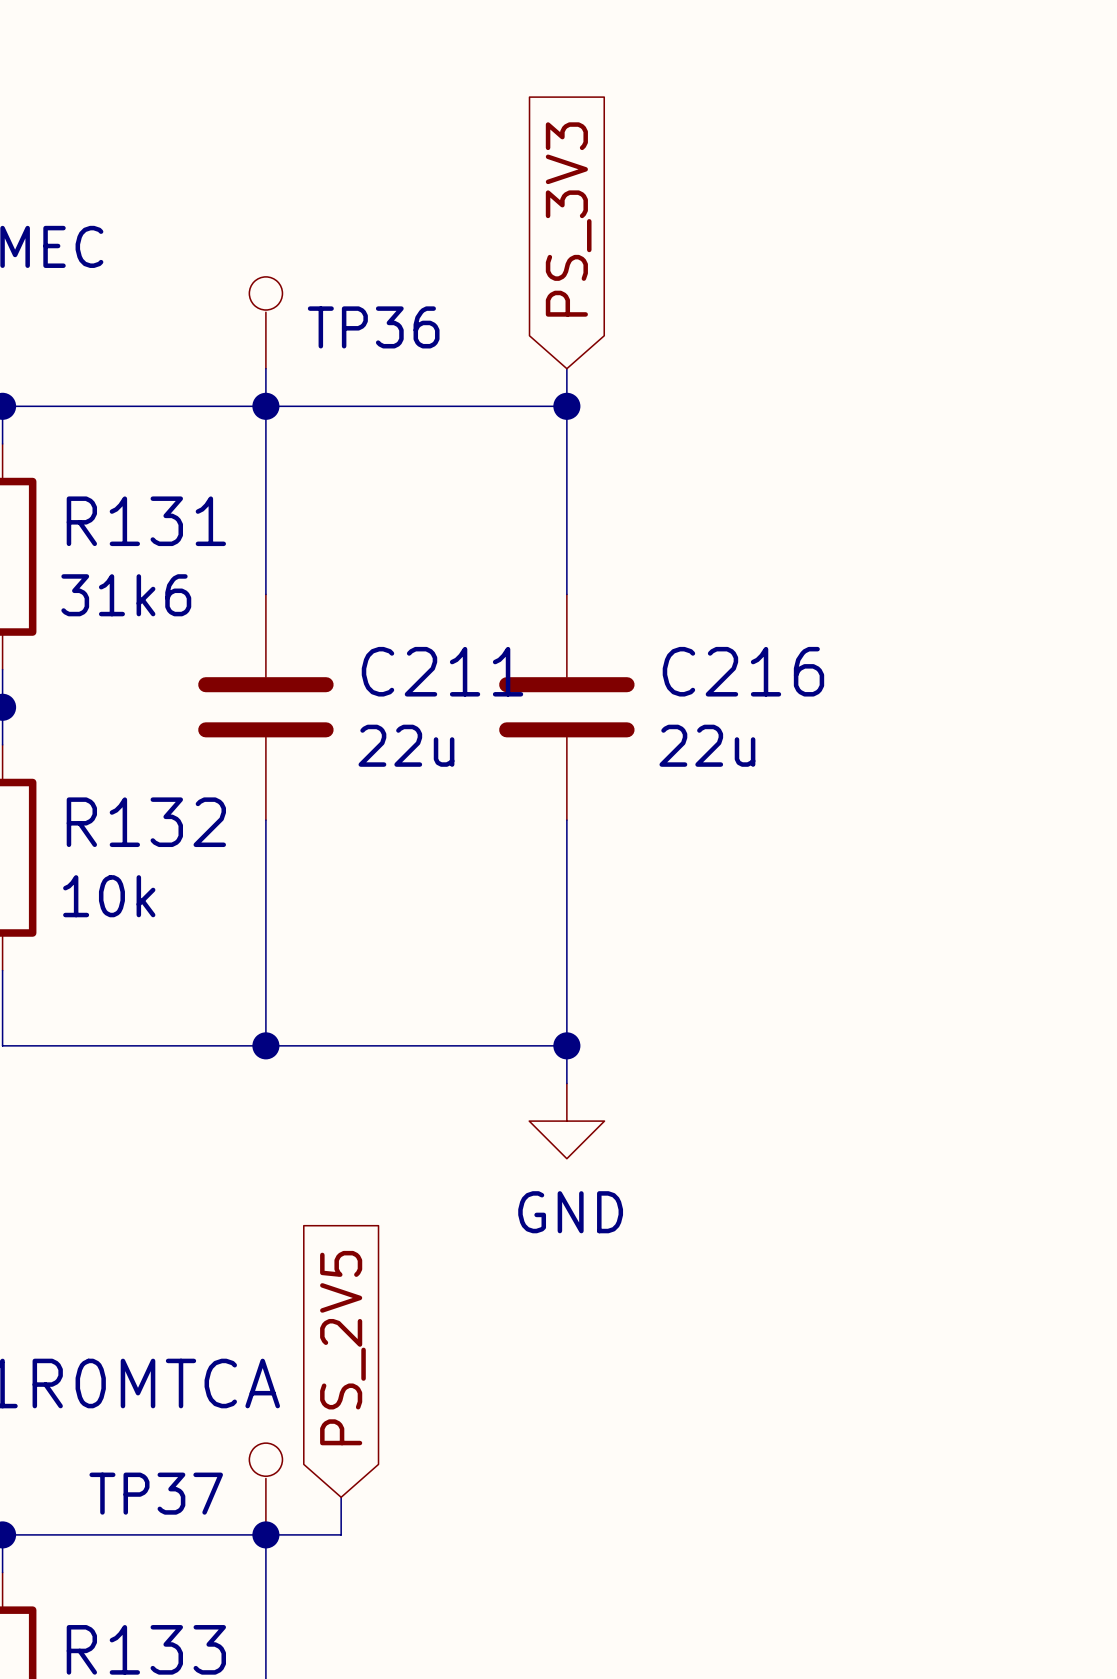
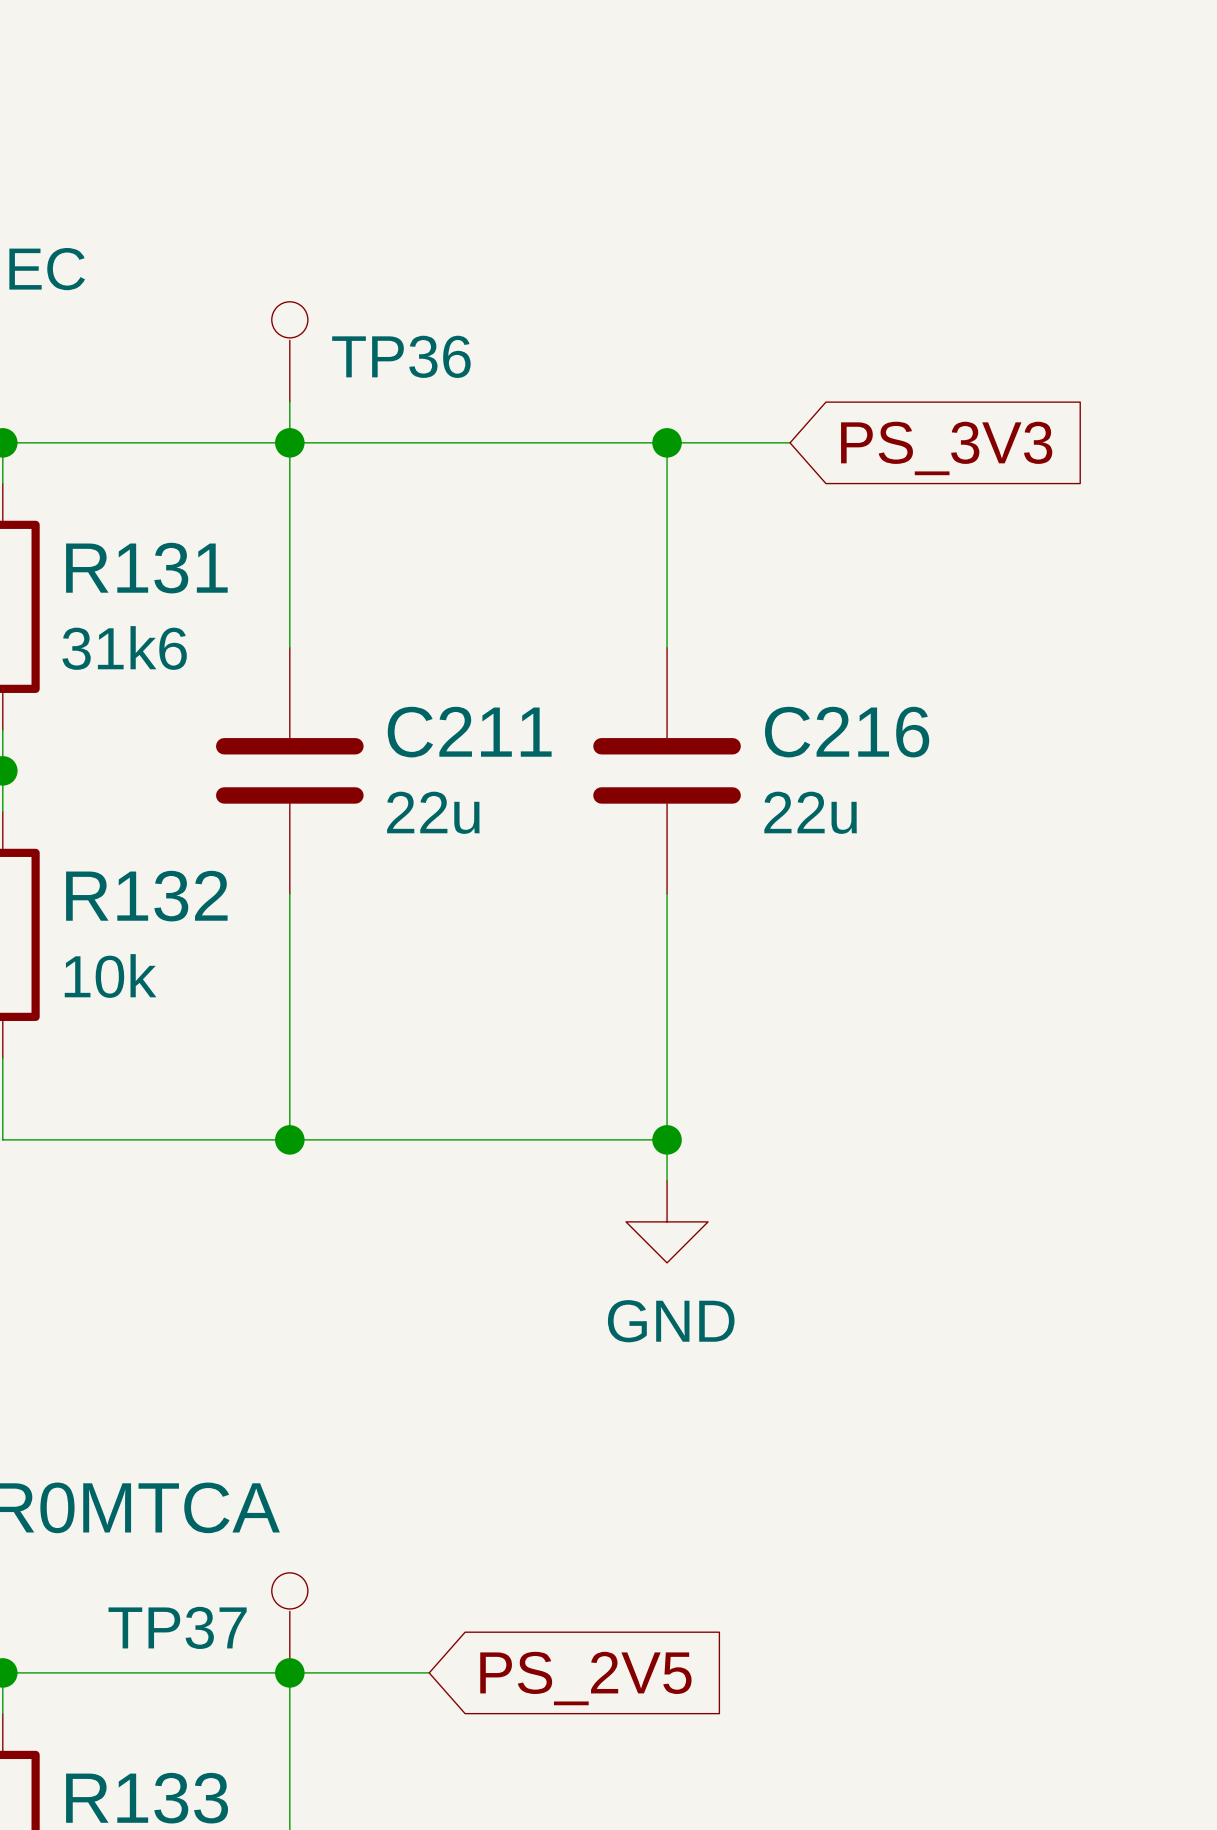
global label rotation: 0° (568, 219) -> 90° clockwise (946, 448)
global label position: PS_3V3 (568, 219) -> PS_3V3 (946, 448)
wire: (566, 368) (566, 594) -> none
wire: none -> (617, 442) (790, 442)
junction position: (566, 406) -> (667, 442)
wire: none -> (667, 442) (667, 647)
C216 position: (566, 707) -> (667, 770)
wire: (566, 820) (566, 1083) -> (667, 893) (667, 1180)
wire: none -> (617, 1139) (667, 1139)
junction position: (566, 1045) -> (667, 1139)
power symbol position: GND (566, 1121) -> GND (667, 1221)
global label rotation: 0° (342, 1348) -> 90° clockwise (585, 1678)
wire: (341, 1497) (341, 1534) -> (429, 1672) (371, 1672)

